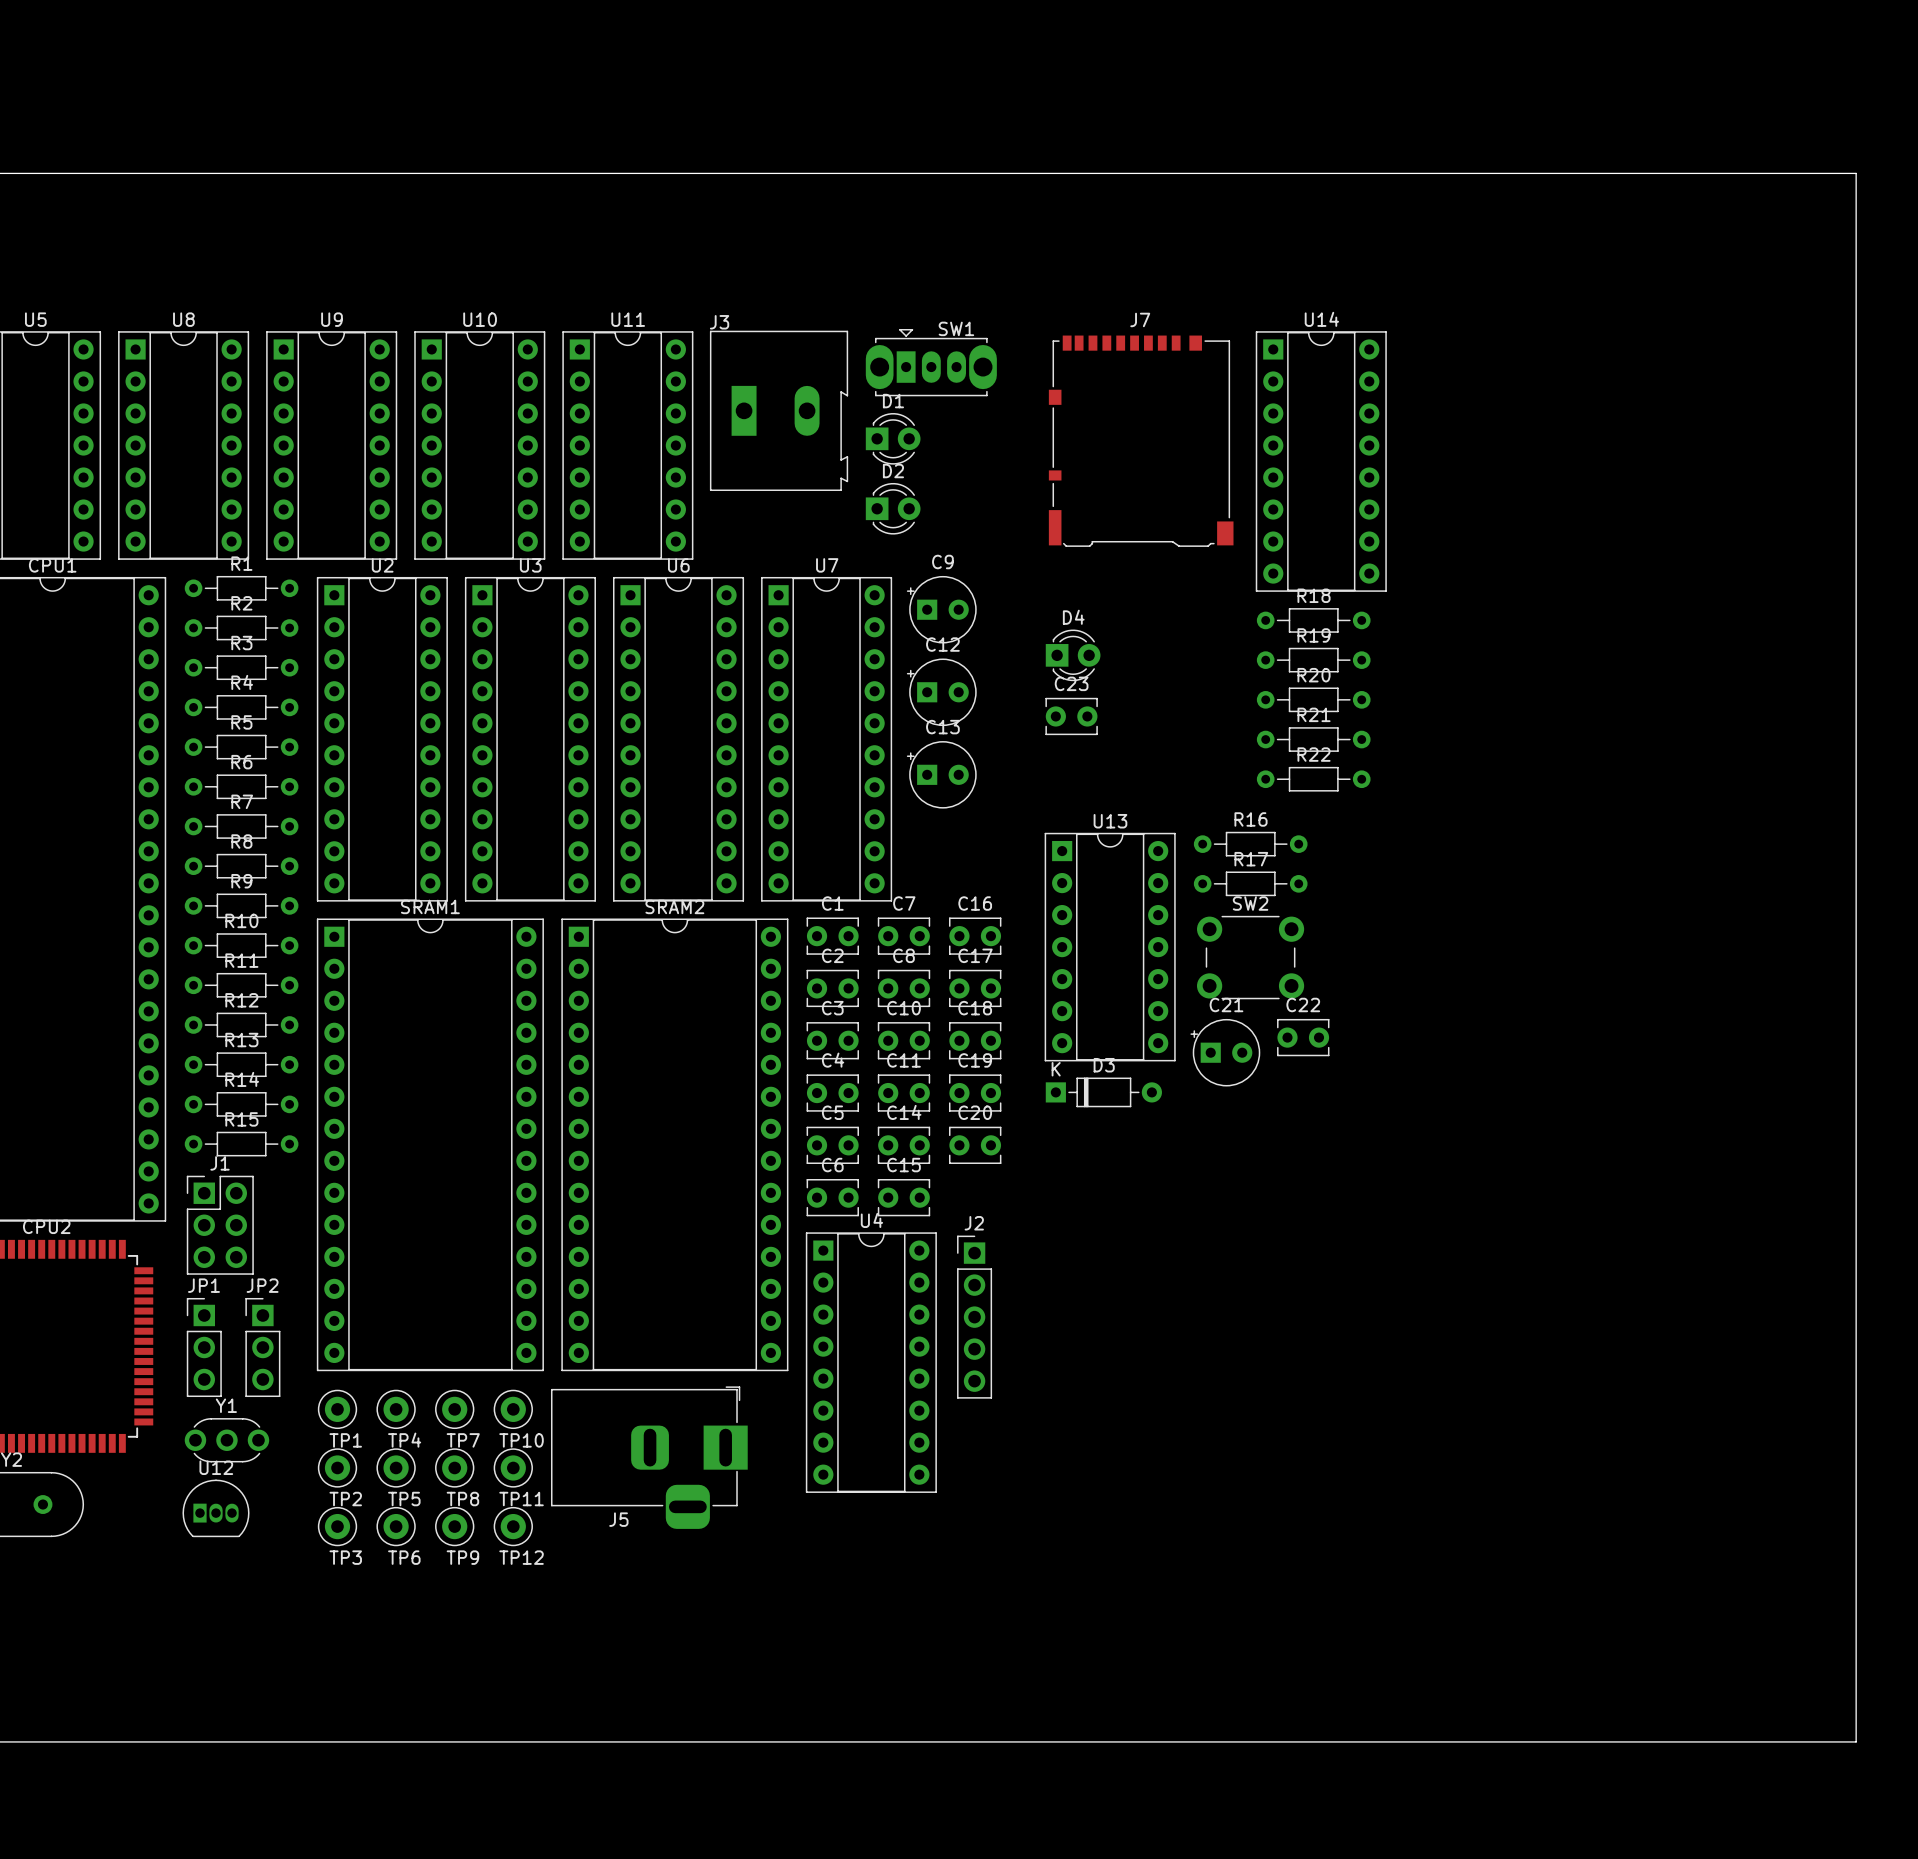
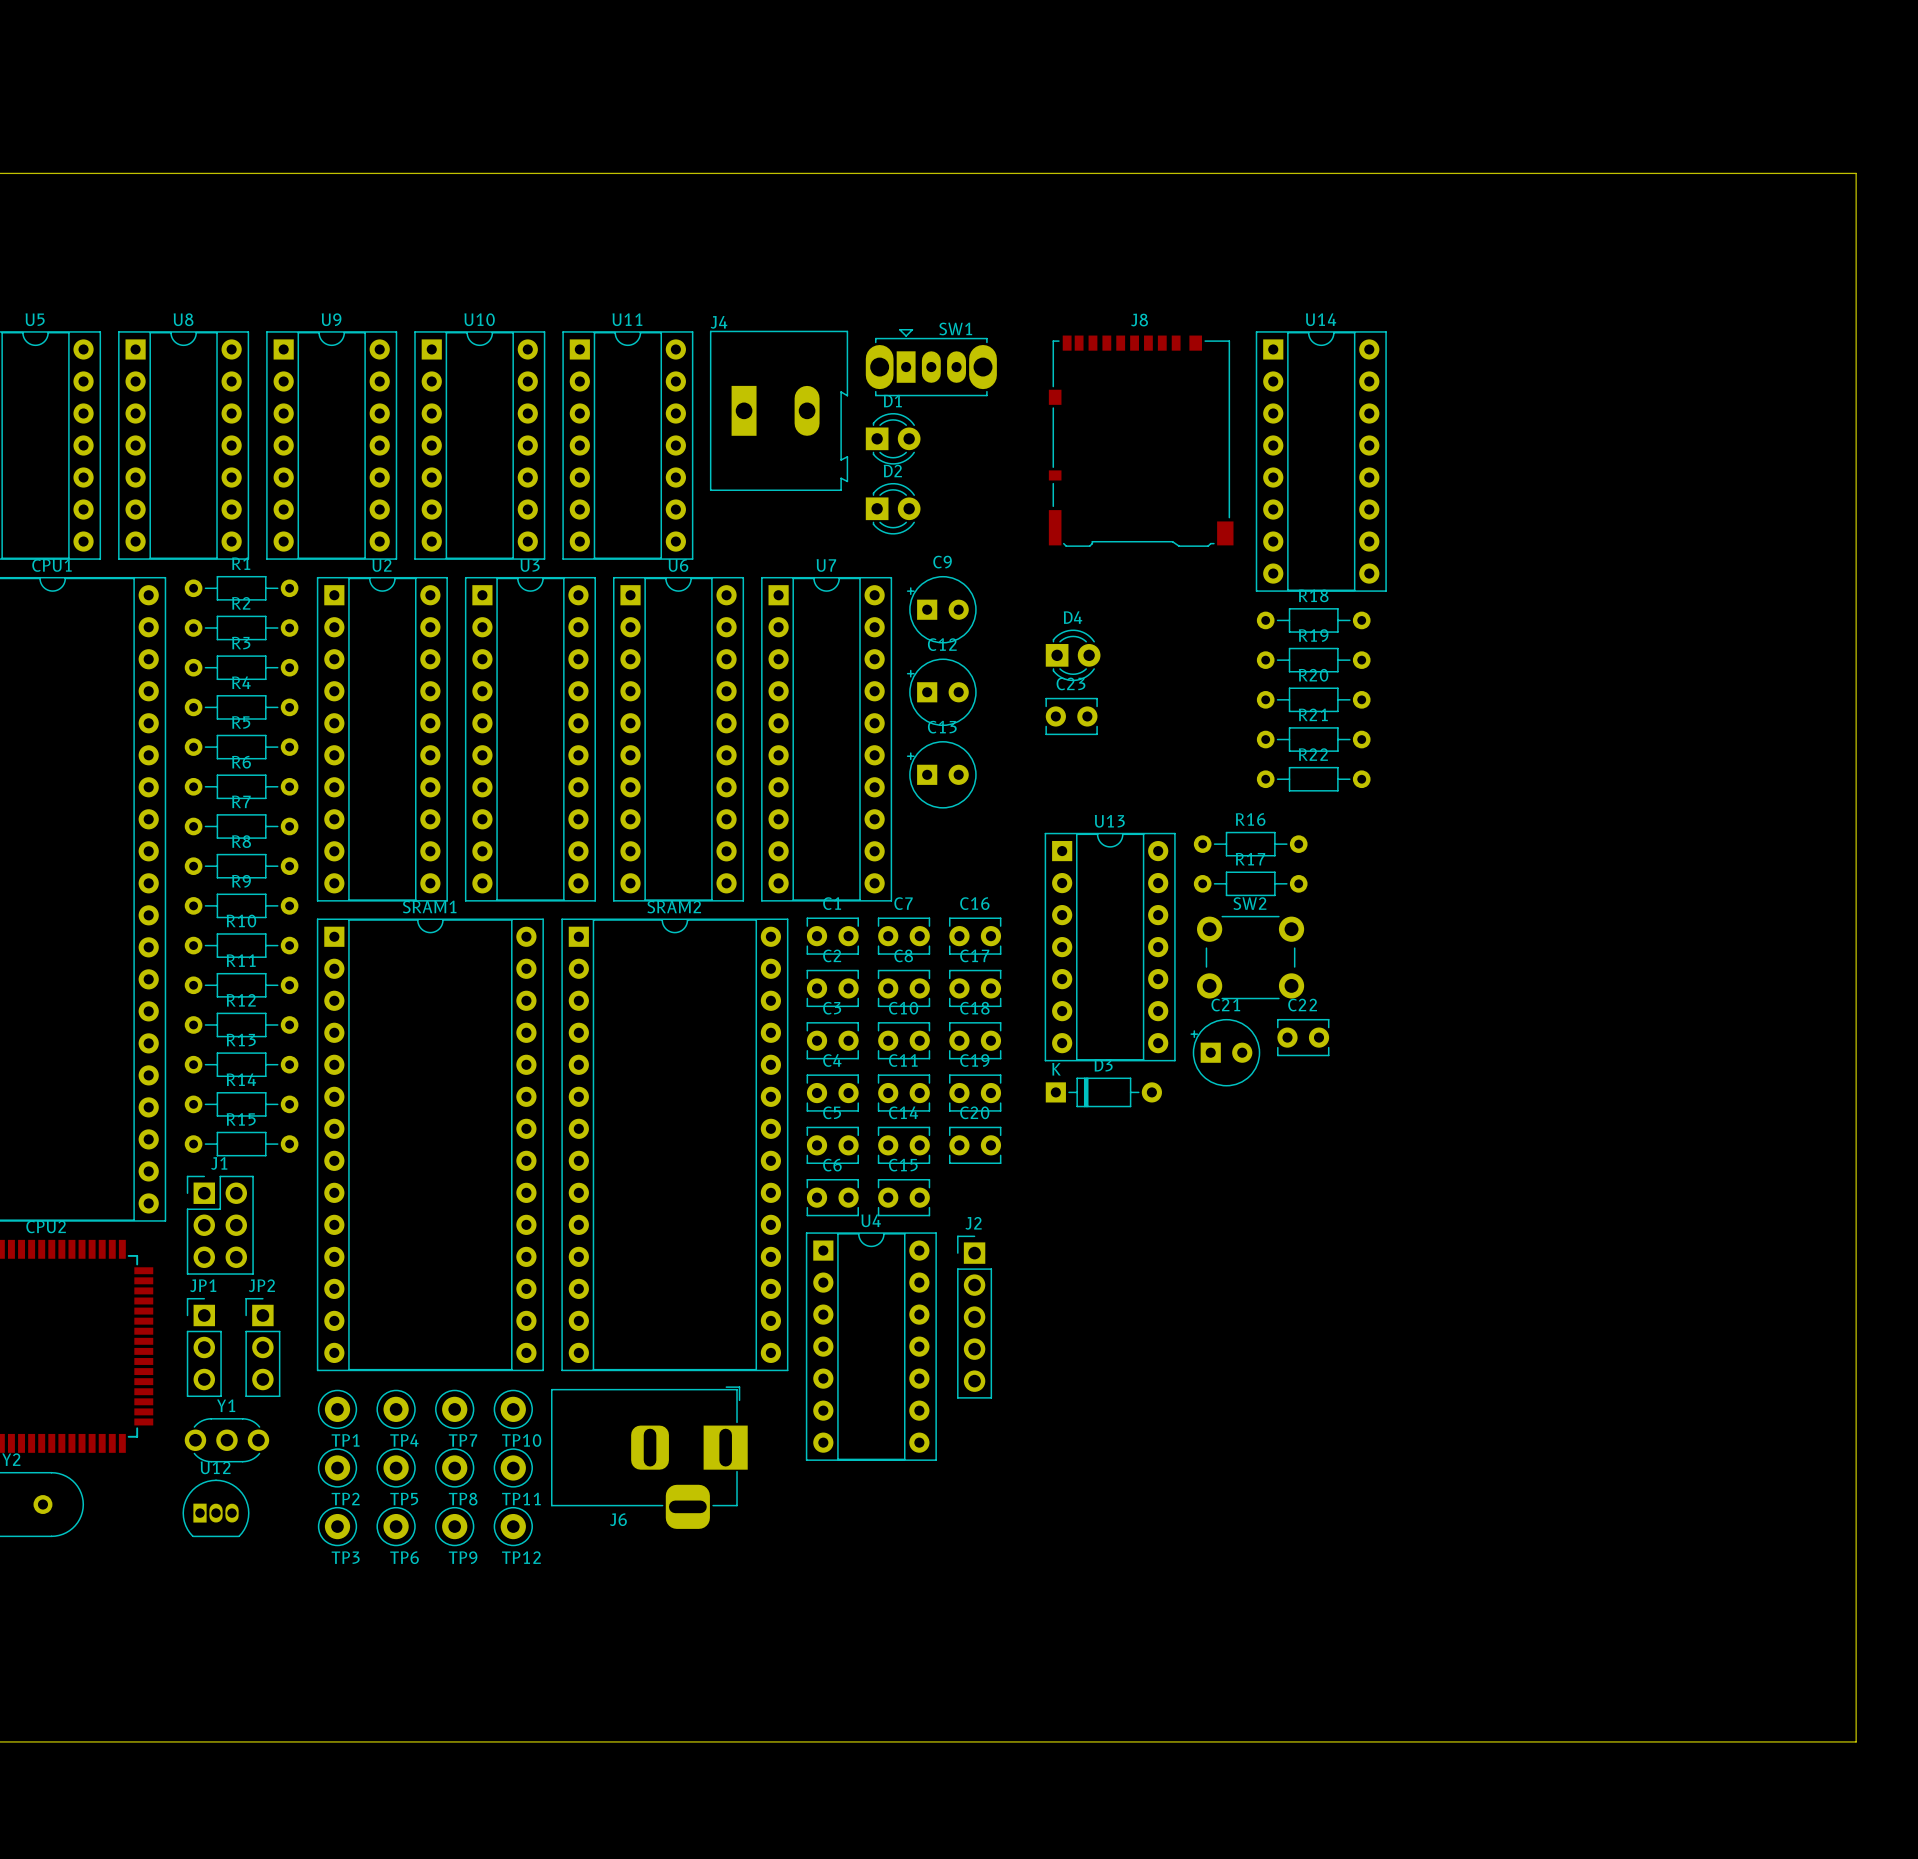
J7 name: J7 (1140, 319) -> J8 (1139, 320)
J3 name: J3 (719, 322) -> J4 (719, 322)
U4 footprint: [805, 1232, 937, 1493] -> [805, 1232, 937, 1461]
J5 name: J5 (618, 1519) -> J6 (618, 1519)

